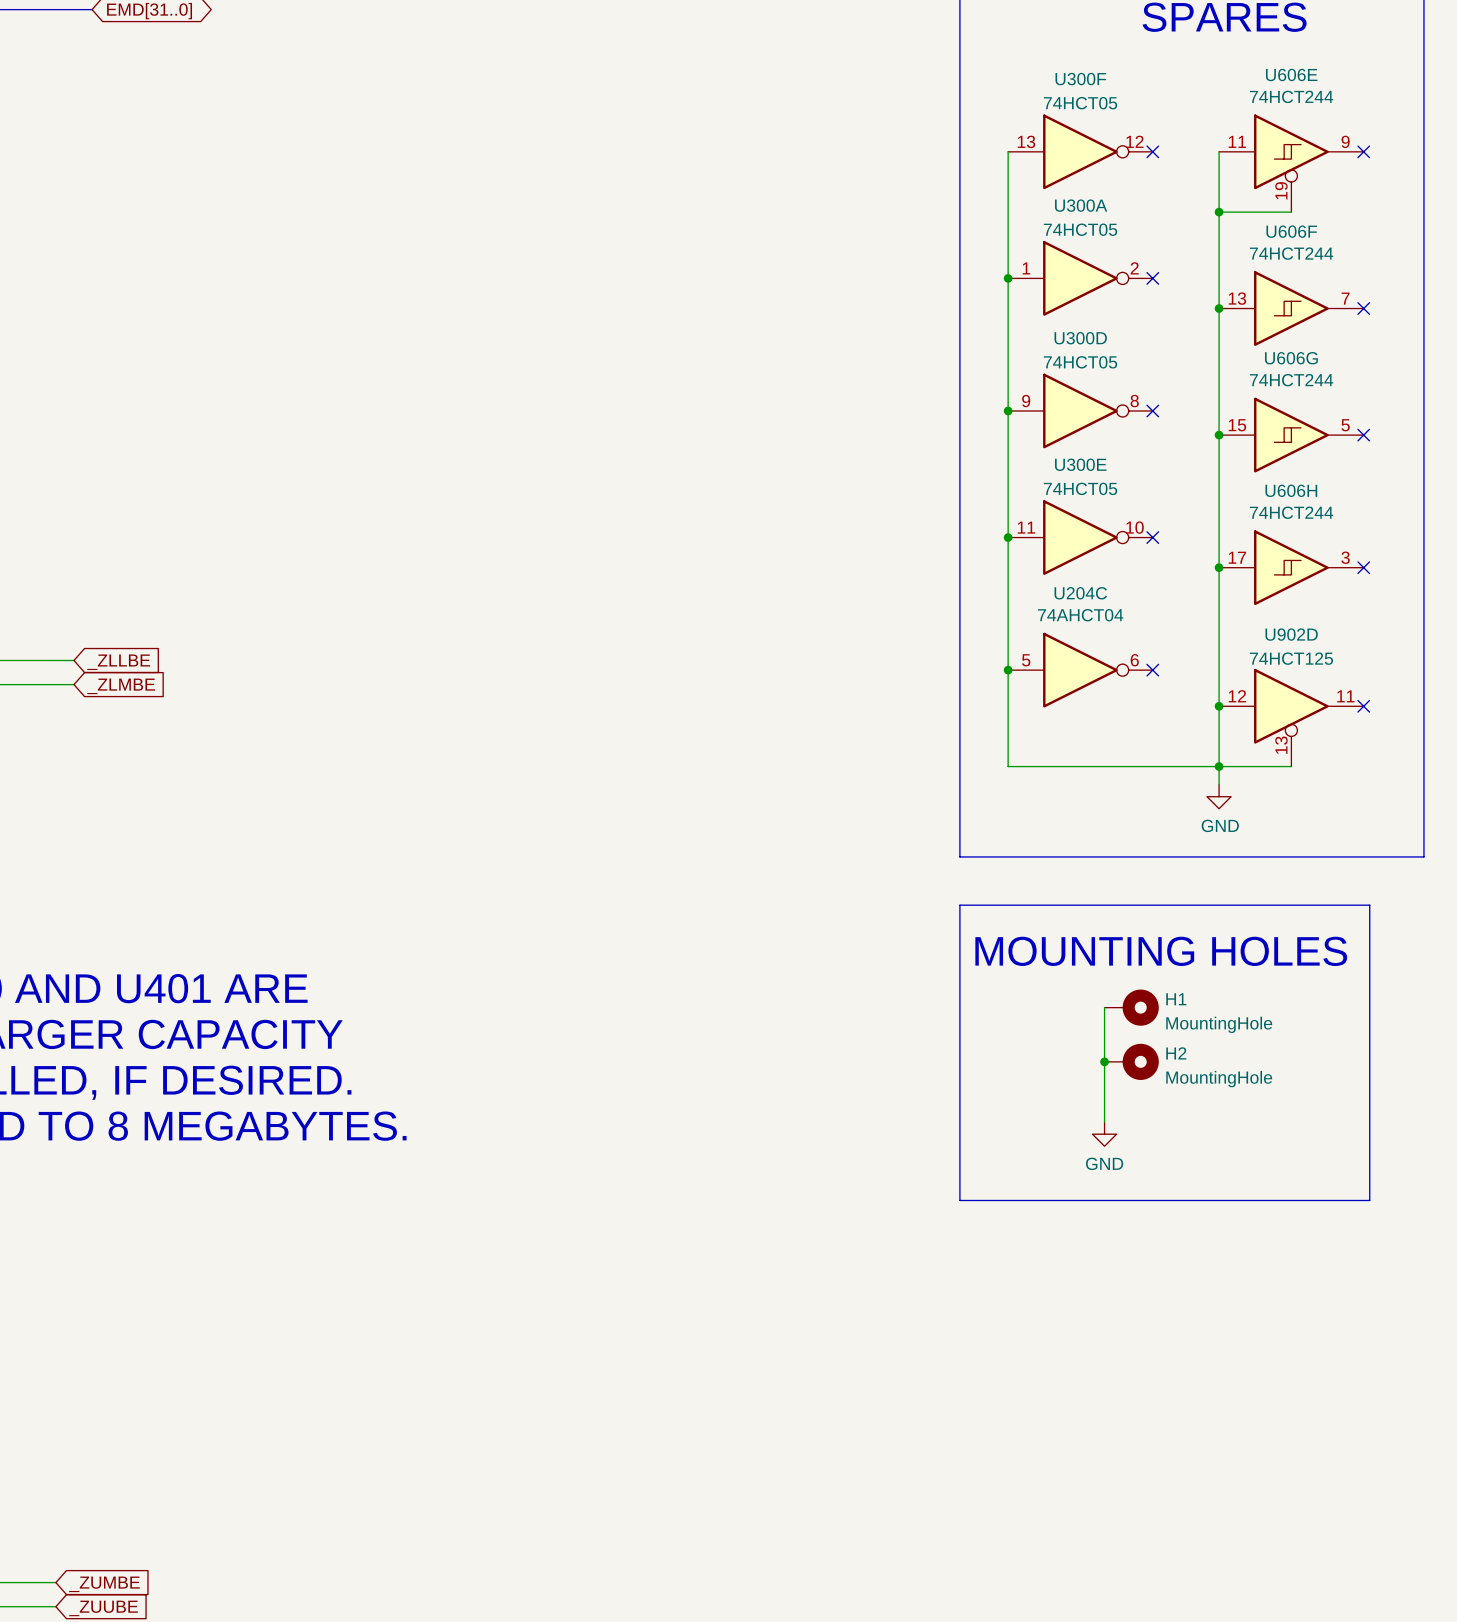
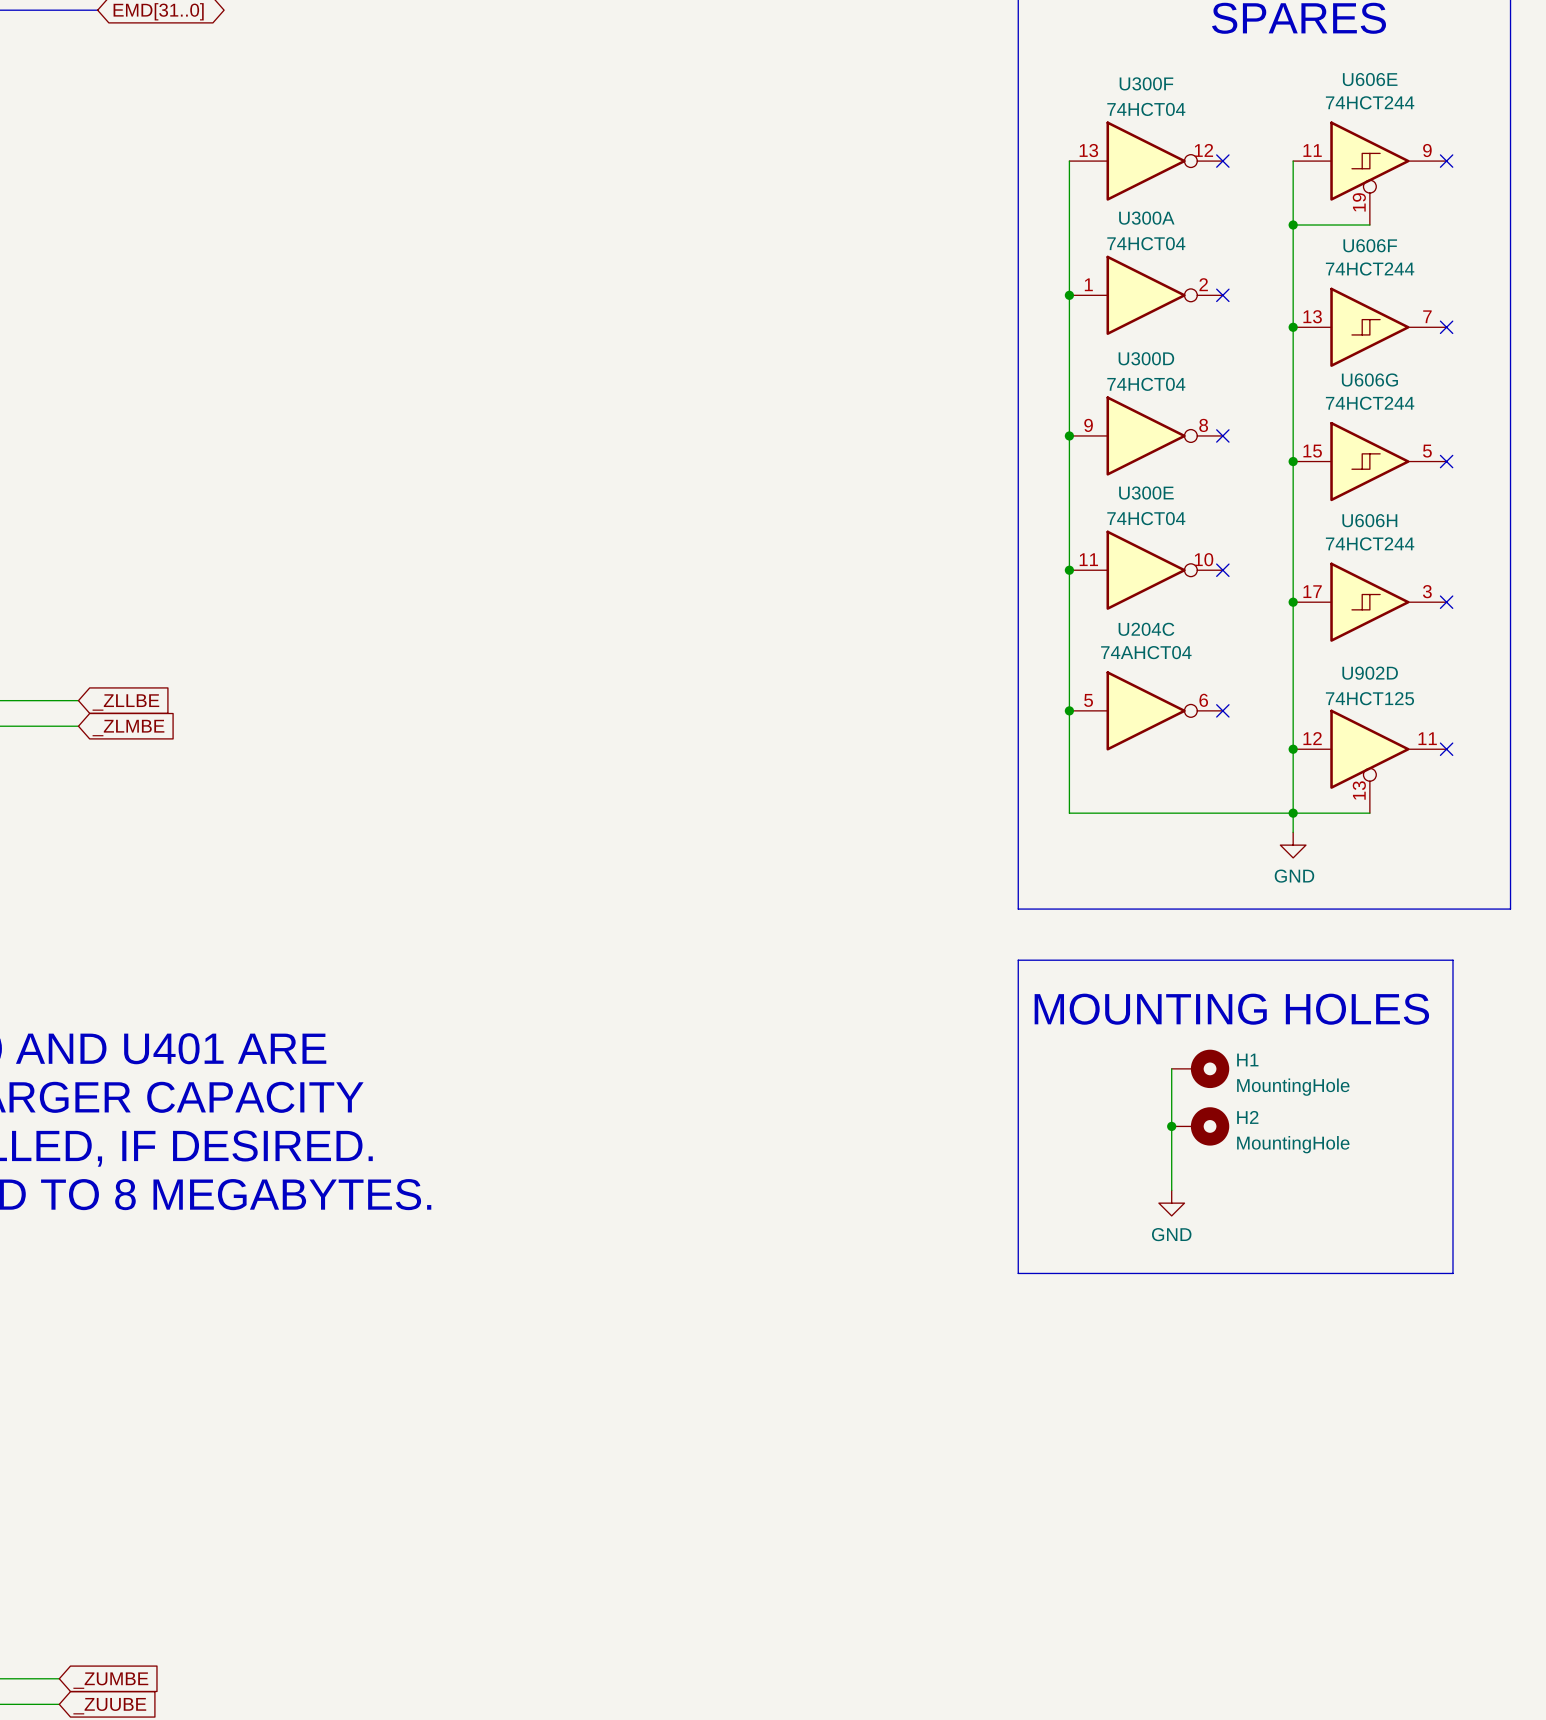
U300F value: 74HCT05 (1080, 103) -> 74HCT04 (1146, 109)
U300A value: 74HCT05 (1080, 229) -> 74HCT04 (1146, 243)
U300D value: 74HCT05 (1080, 362) -> 74HCT04 (1146, 384)
U300E value: 74HCT05 (1080, 488) -> 74HCT04 (1146, 518)

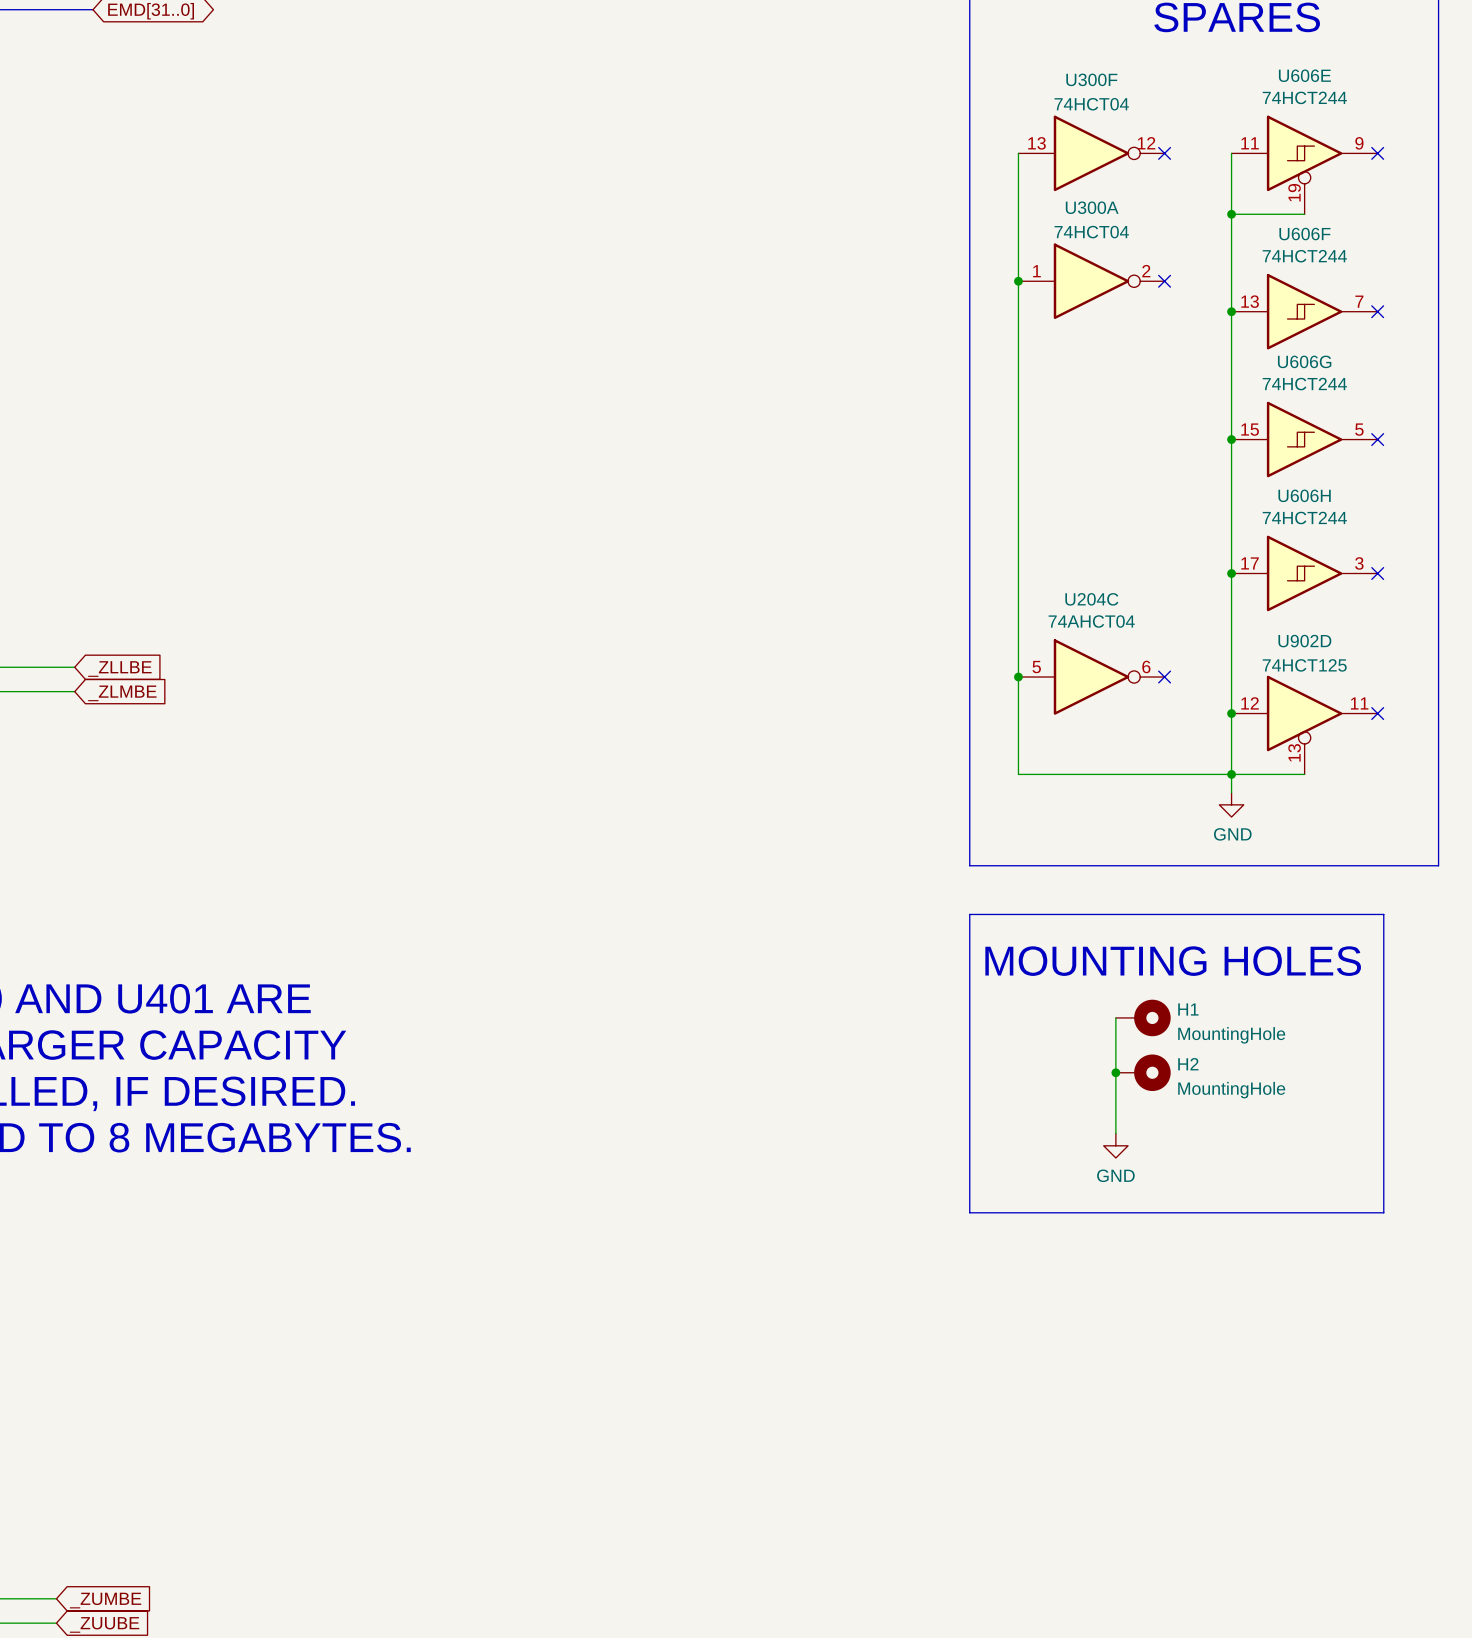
junction: (1069, 435) -> none
U300D: 74HCT04 (1146, 435) -> none
no-connect mark: (1222, 435) -> none
junction: (1069, 570) -> none
U300E: 74HCT04 (1146, 570) -> none
no-connect mark: (1222, 570) -> none

